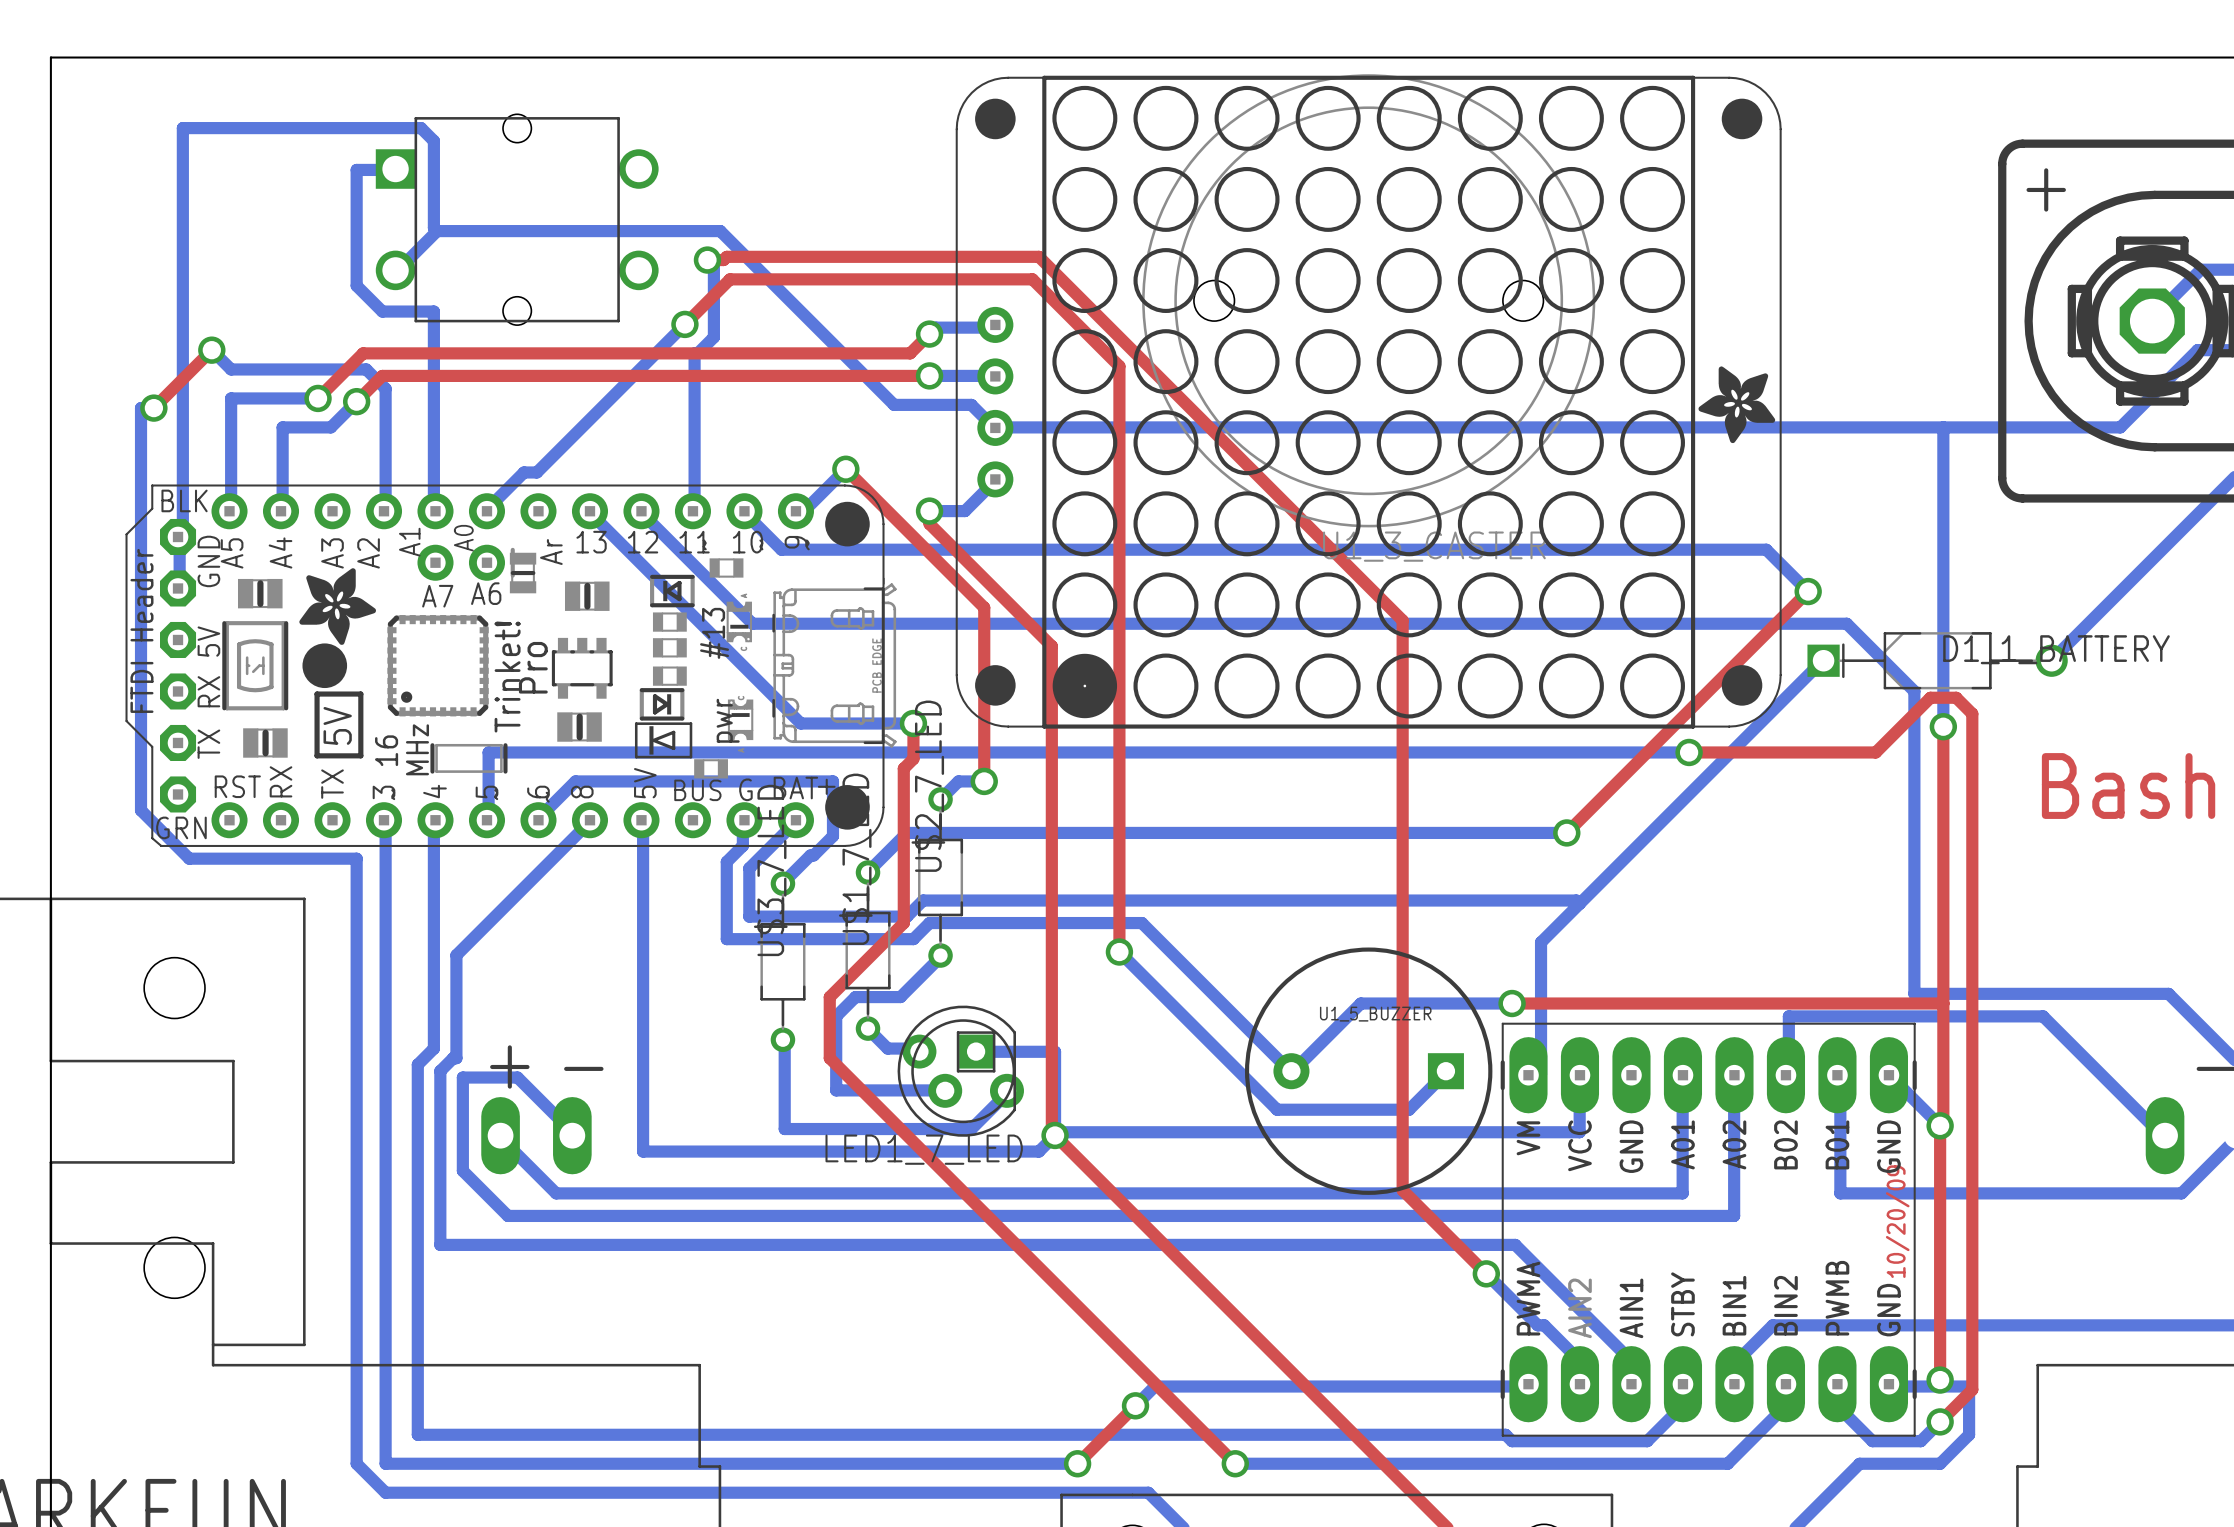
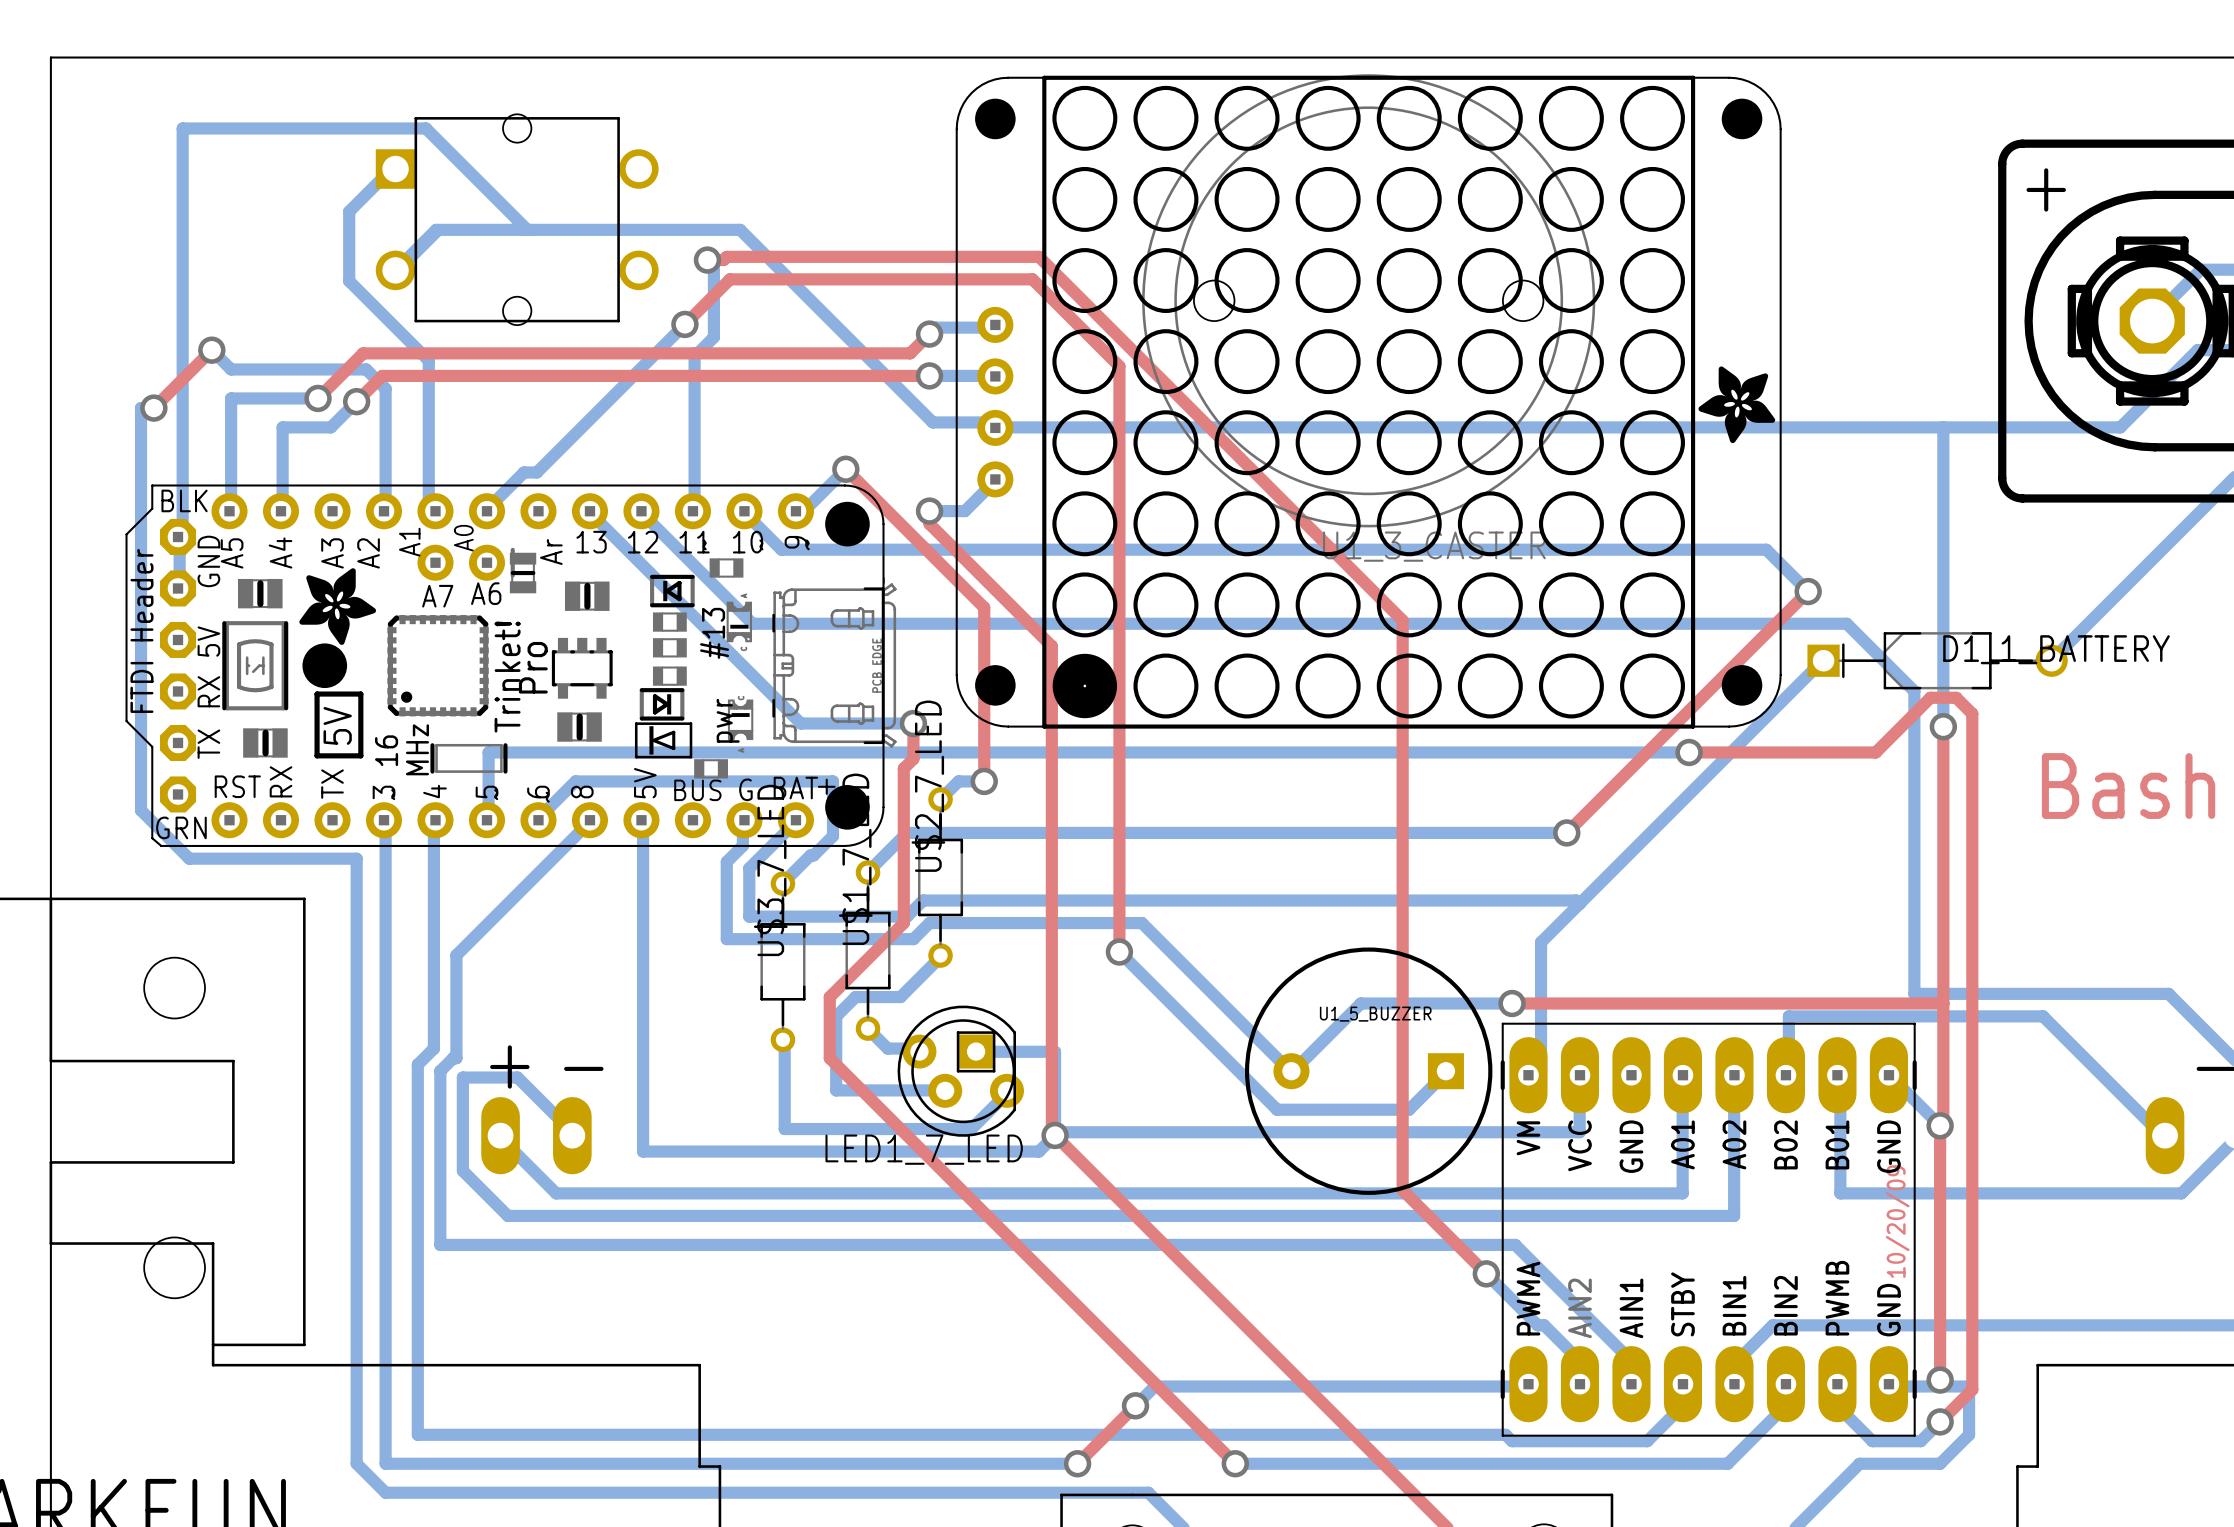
bottom track: (395, 169) (356, 169) (356, 285) (382, 311) (433, 311) (433, 511) (435, 511) -> (395, 169) (389, 171) (349, 211) (349, 281) (428, 360) (428, 509) (435, 511)
bottom track: none -> (527, 229) (425, 128) (182, 128) (182, 533) (178, 536)
bottom track: (995, 427) (971, 404) (894, 404) (720, 231) (437, 231) (433, 227) (433, 140) (421, 128) (182, 128) (182, 533) (178, 536) -> (995, 427) (993, 422) (932, 422) (740, 229) (436, 229) (395, 270)

